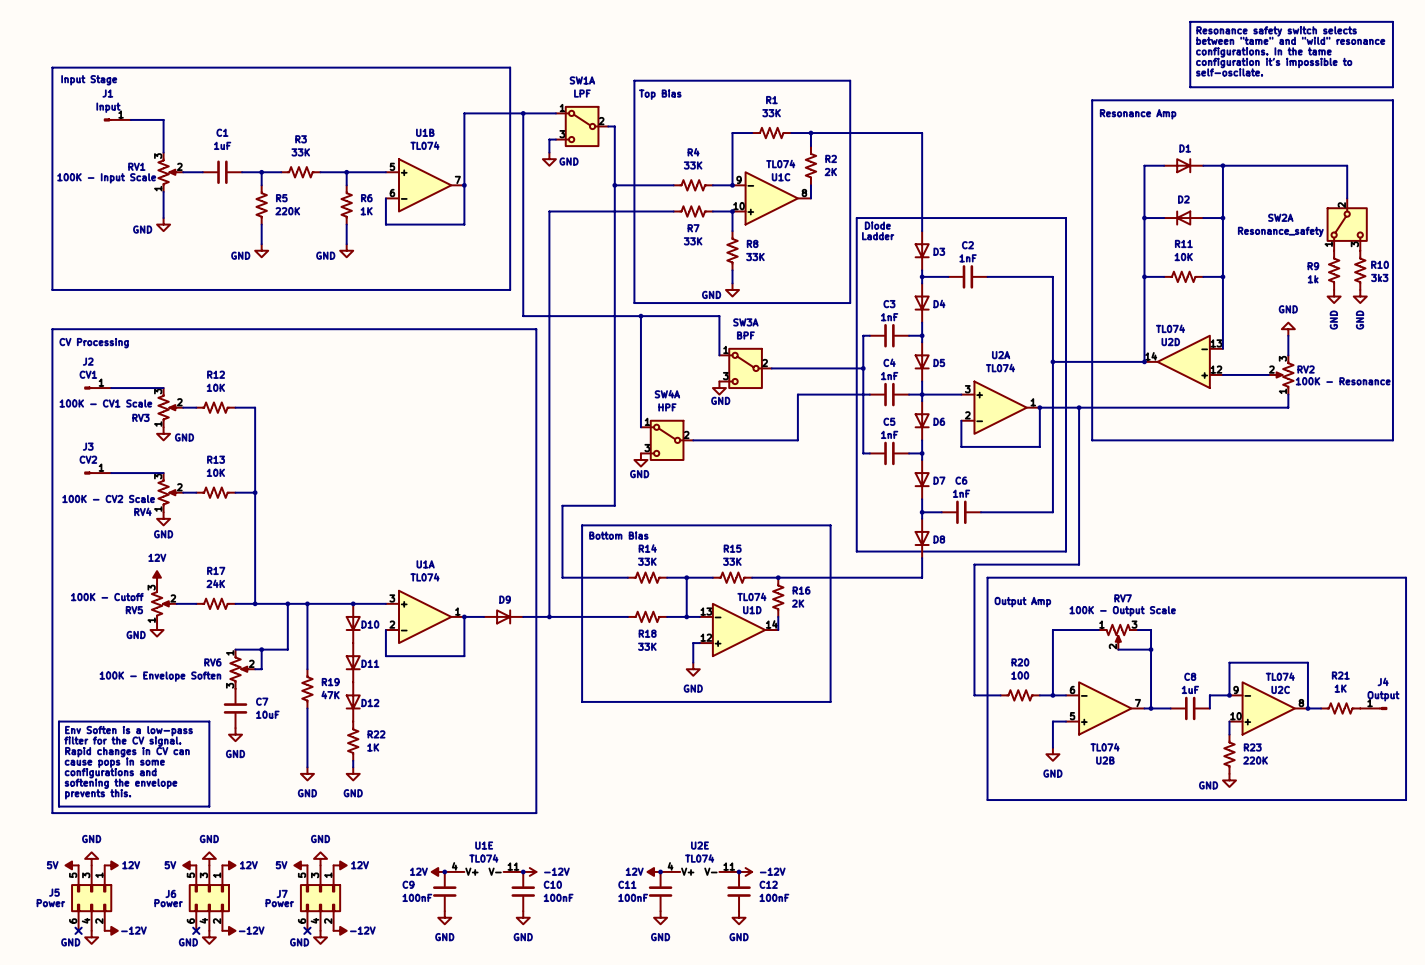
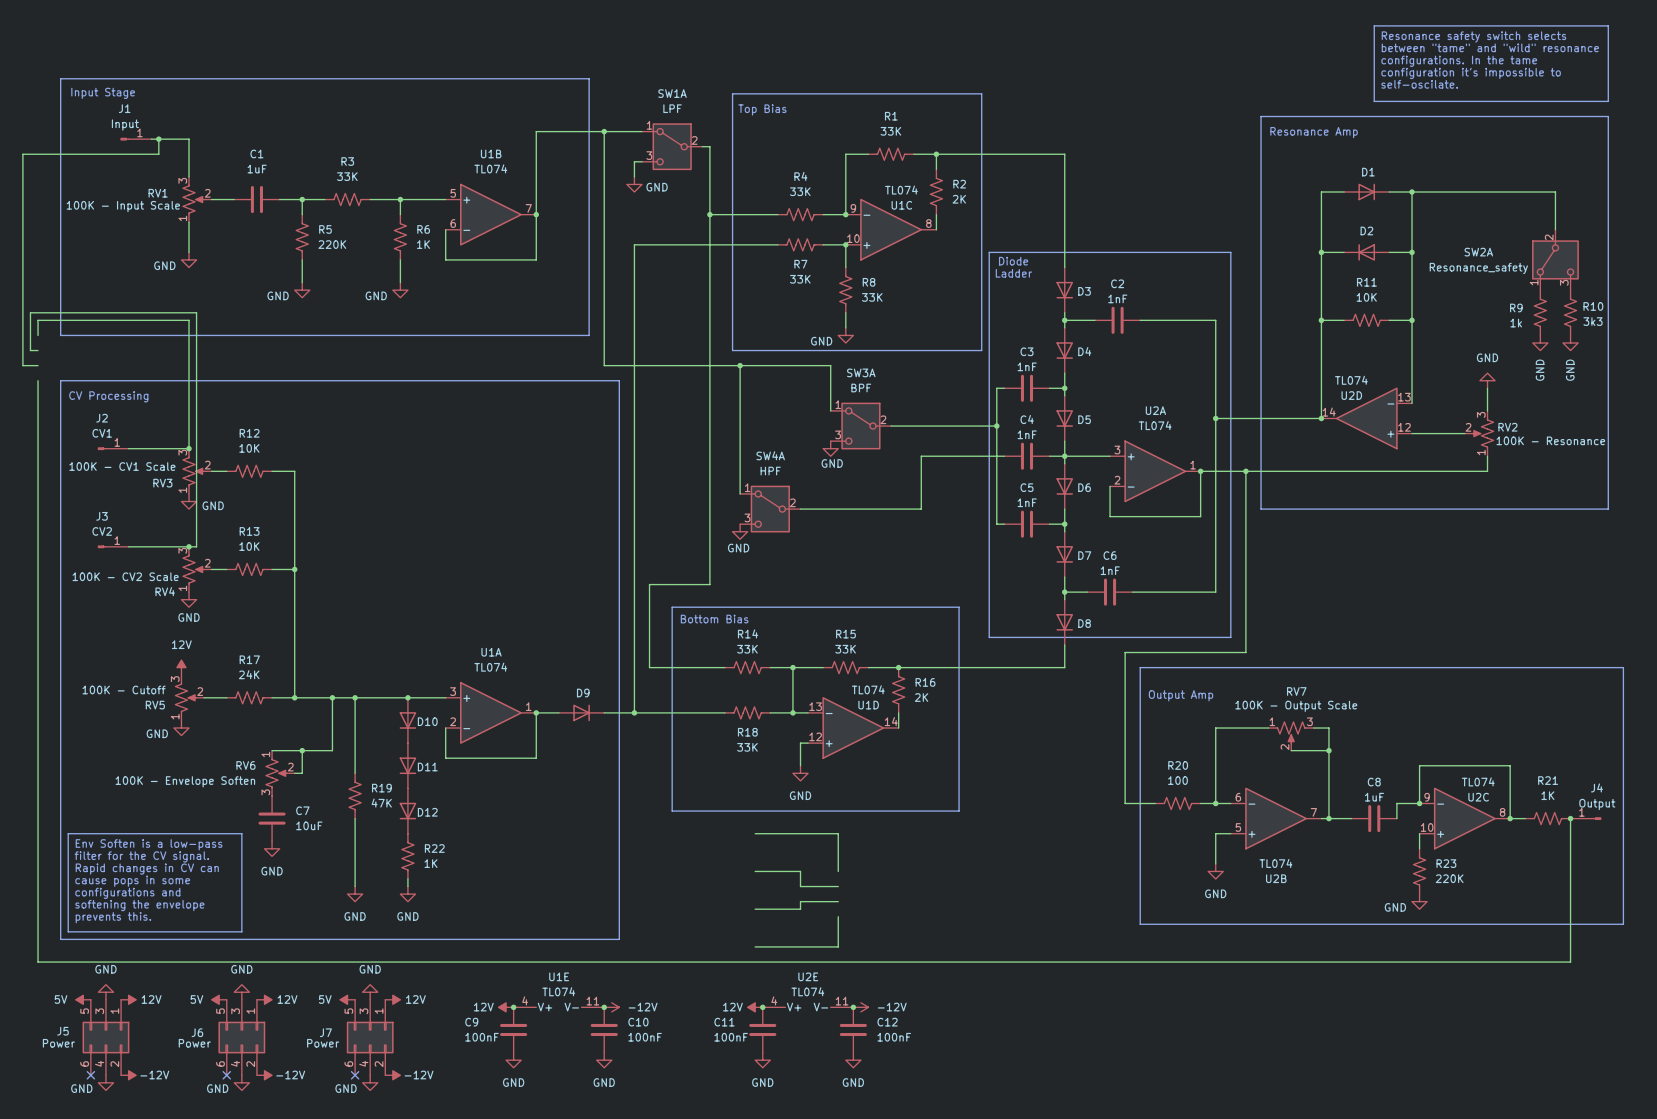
wire: none -> (158, 139) (158, 154) (22, 154) (22, 365) (38, 365)
junction: none -> (158, 139)
wire: none -> (38, 335) (38, 320) (189, 320) (189, 448)
wire: none -> (38, 350) (30, 350) (30, 312) (196, 312) (196, 546) (189, 546)
wire: none -> (38, 380) (38, 962) (1570, 962) (1570, 818)
junction: none -> (189, 448)
junction: none -> (189, 546)
junction: none -> (1570, 818)
wire: none -> (755, 833) (838, 833) (838, 871)
wire: none -> (755, 871) (800, 871) (800, 886) (838, 886)
wire: none -> (838, 901) (800, 901) (800, 909) (755, 909)
wire: none -> (838, 916) (838, 946) (755, 946)

